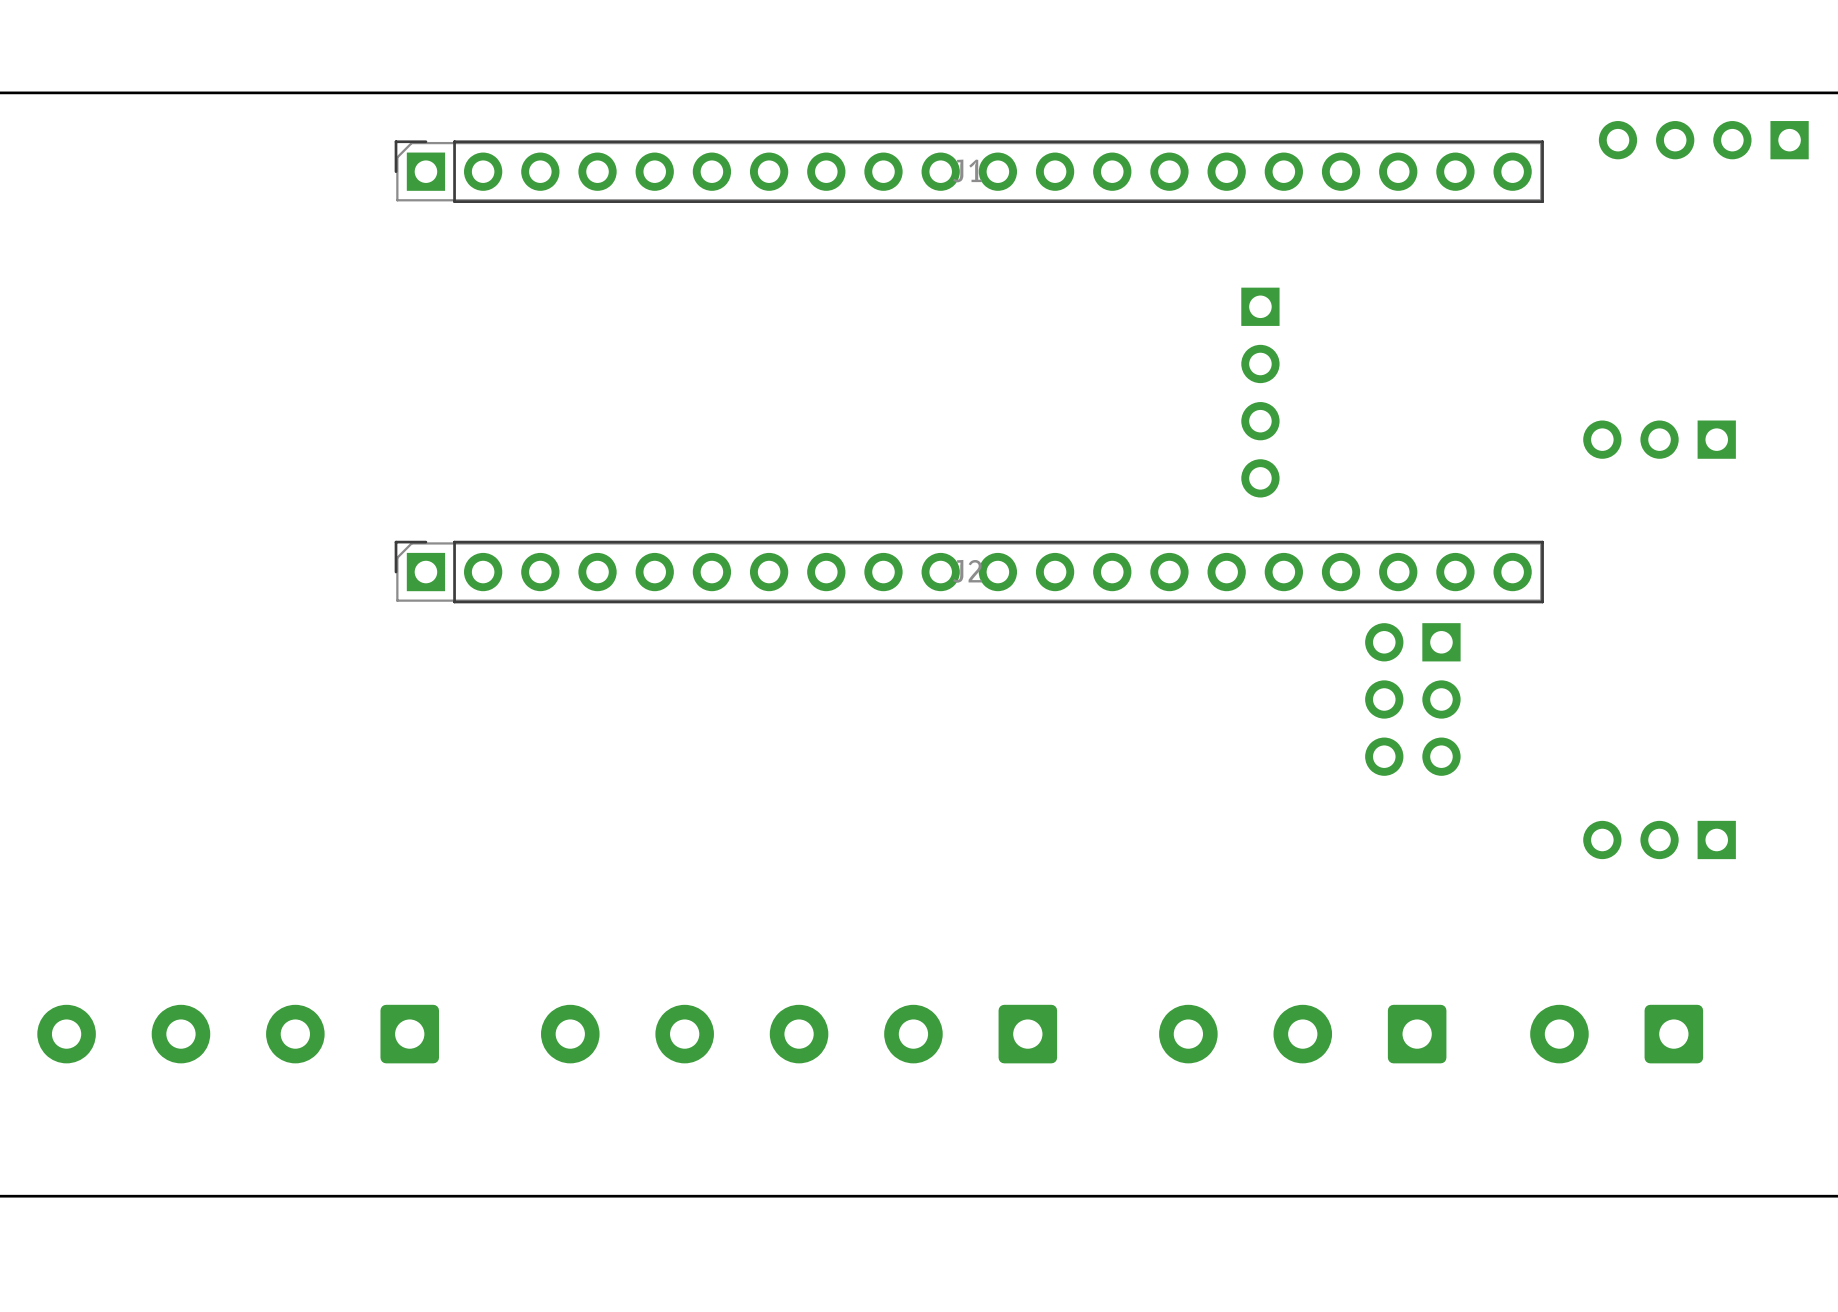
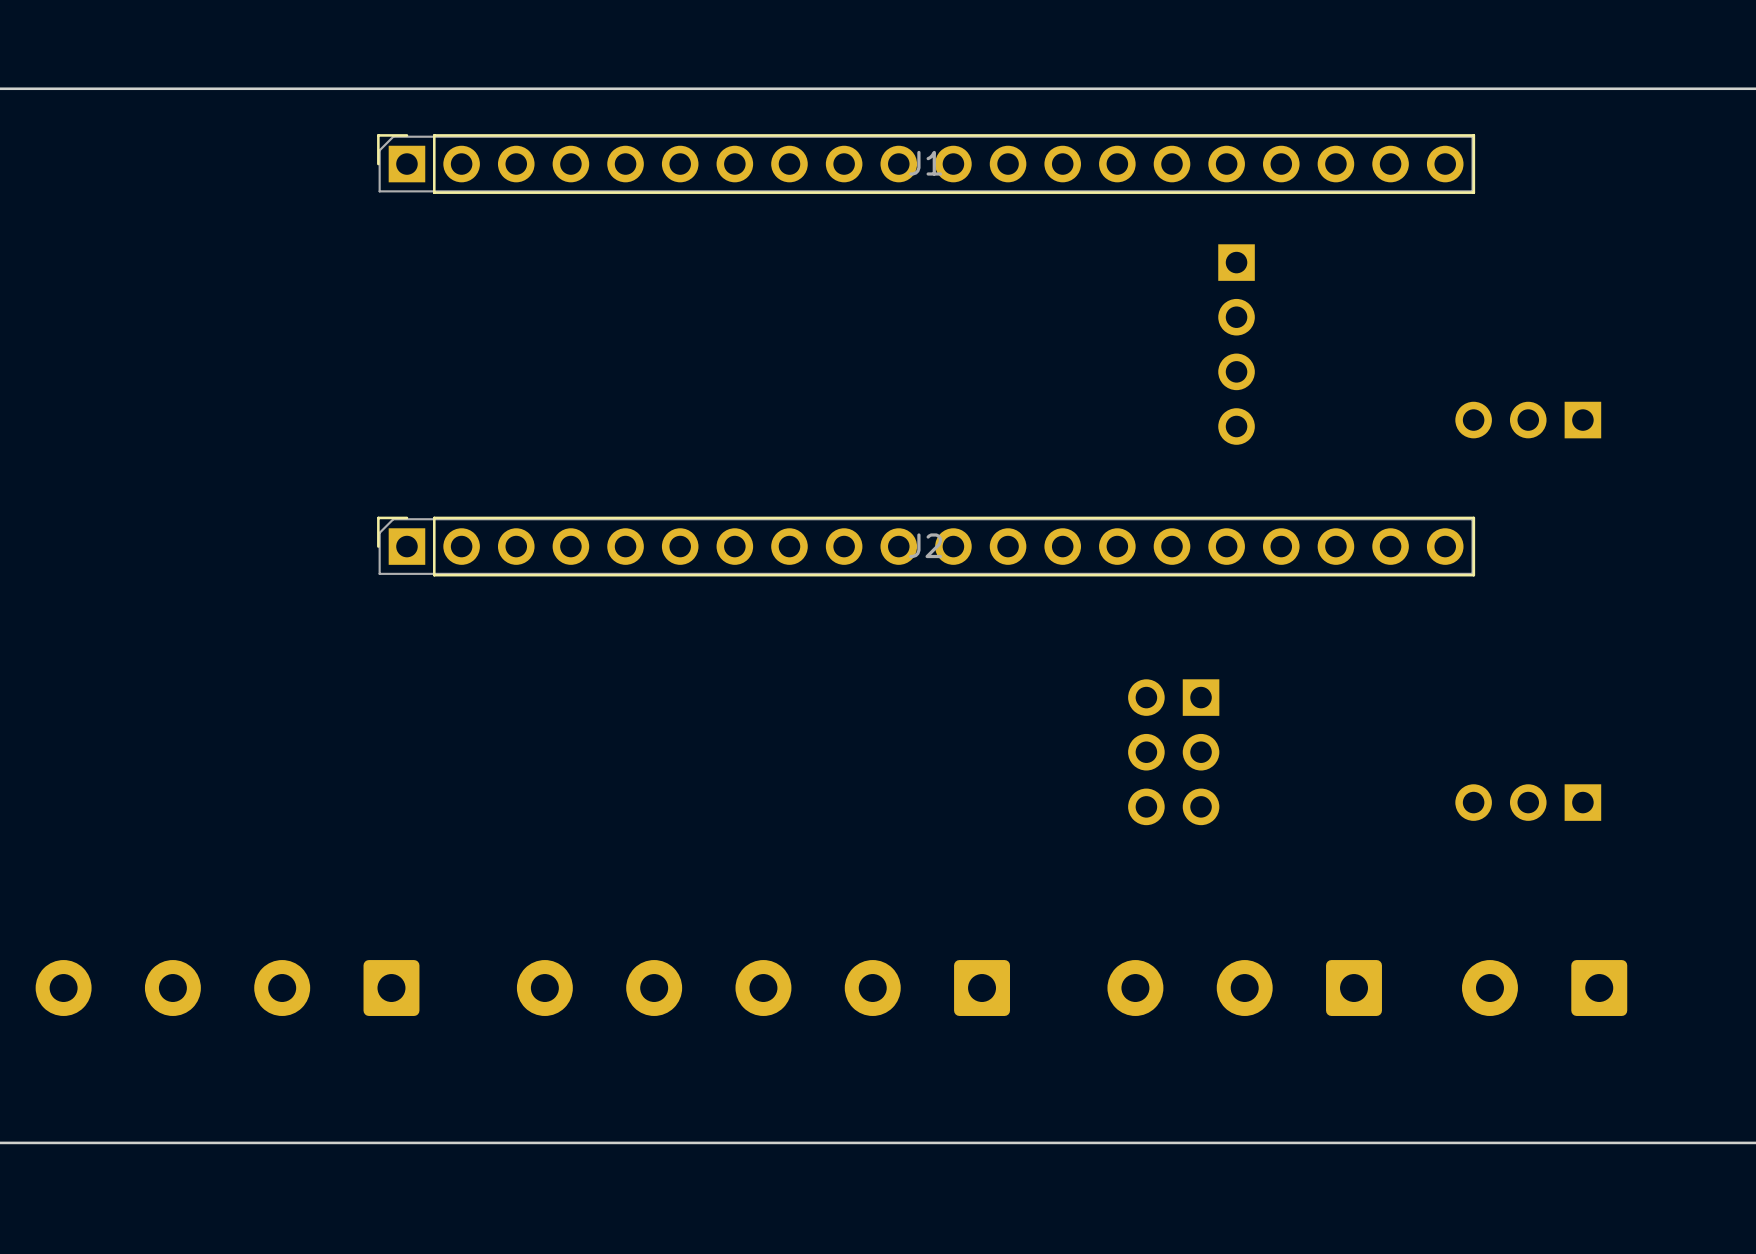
part: (1703, 140) -> none
part position: (1260, 392) -> (1236, 344)
part position: (1659, 439) -> (1528, 420)
part position: (1412, 699) -> (1173, 752)
part position: (1659, 839) -> (1528, 802)

